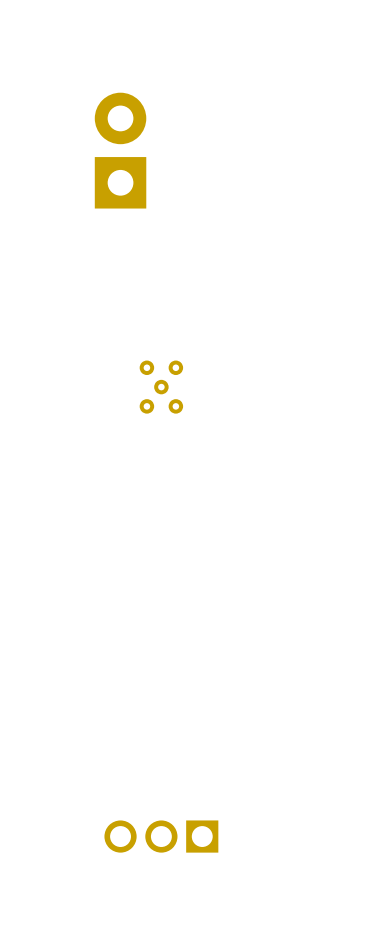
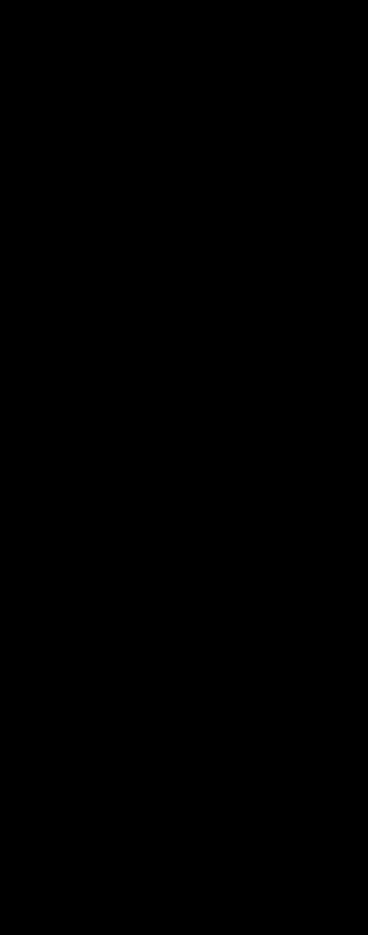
part: (120, 150) -> none
part: (161, 387) -> none
part: (161, 836) -> none

